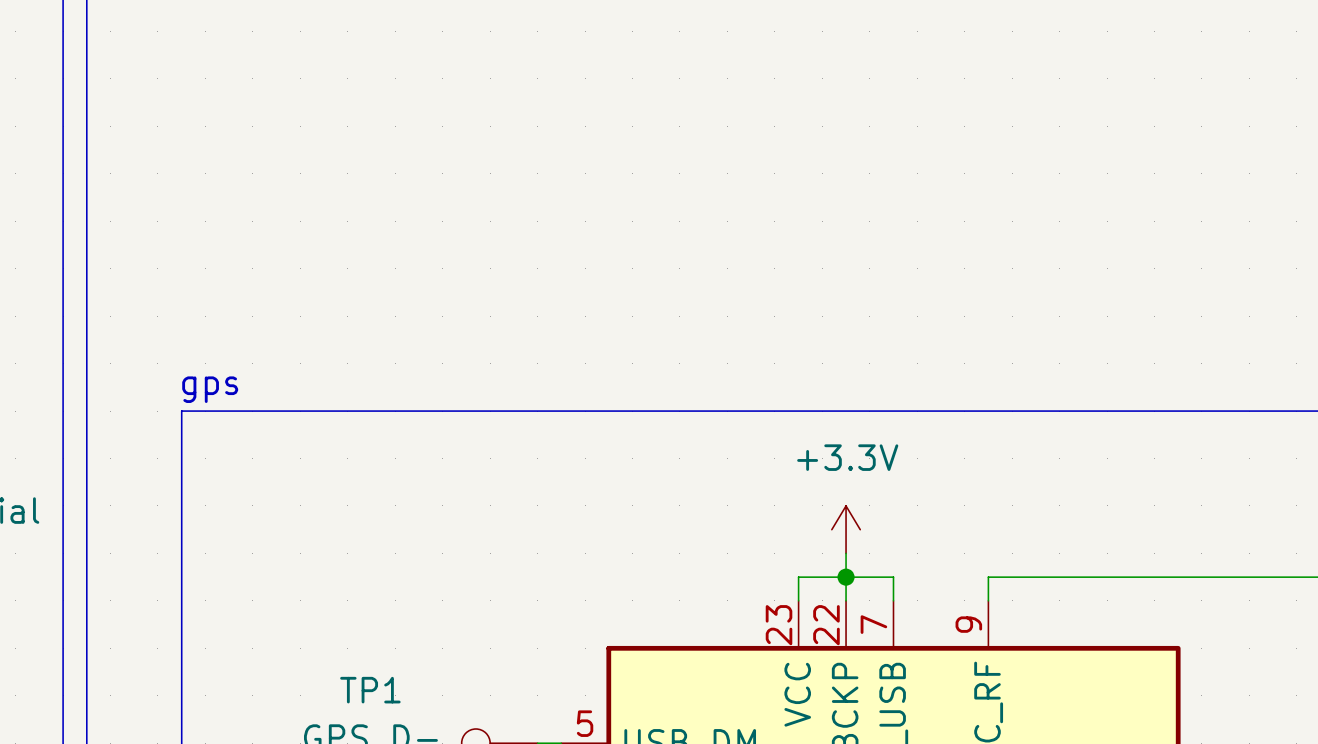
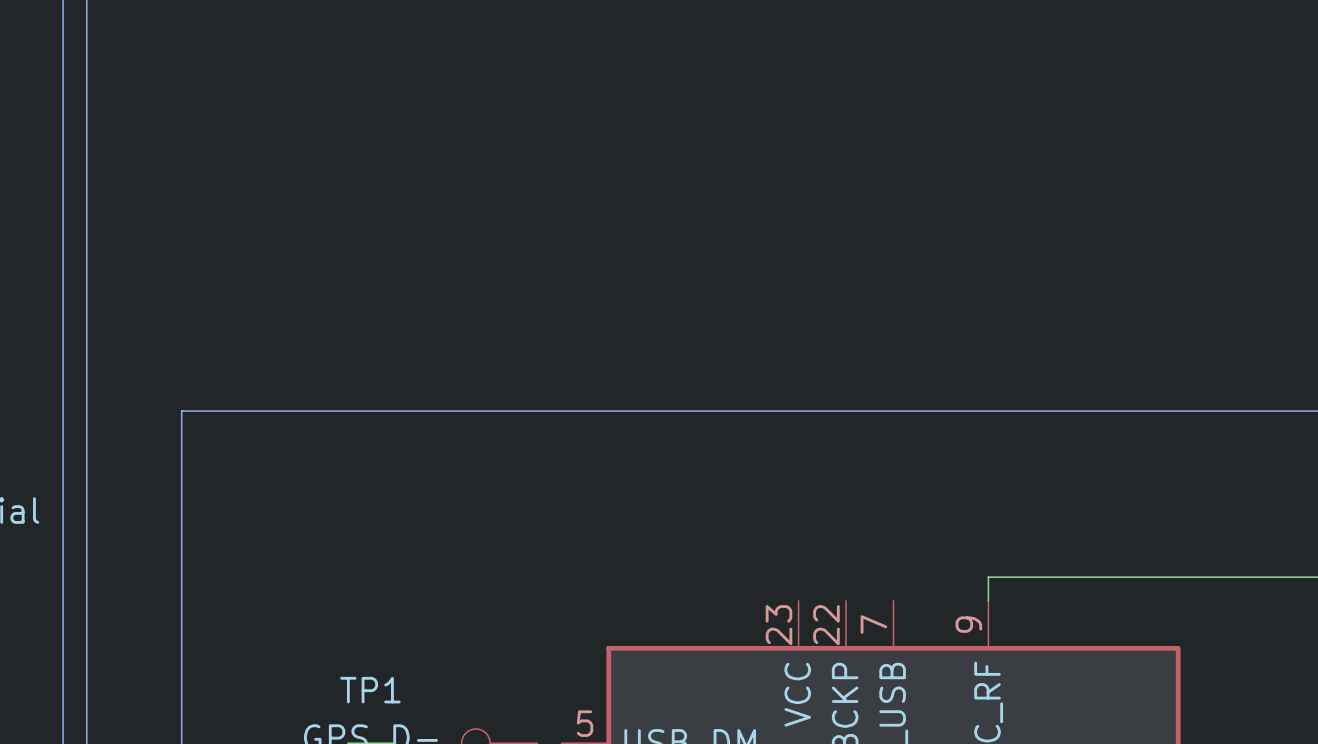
text: gps (210, 389) -> none
power symbol: +3.3V (846, 529) -> none
wire: (846, 553) (846, 600) -> none
junction: (846, 577) -> none
wire: (798, 600) (798, 577) (893, 577) (893, 600) -> none
wire: none -> (347, 743) (395, 743)
wire: (537, 743) (561, 743) -> none

